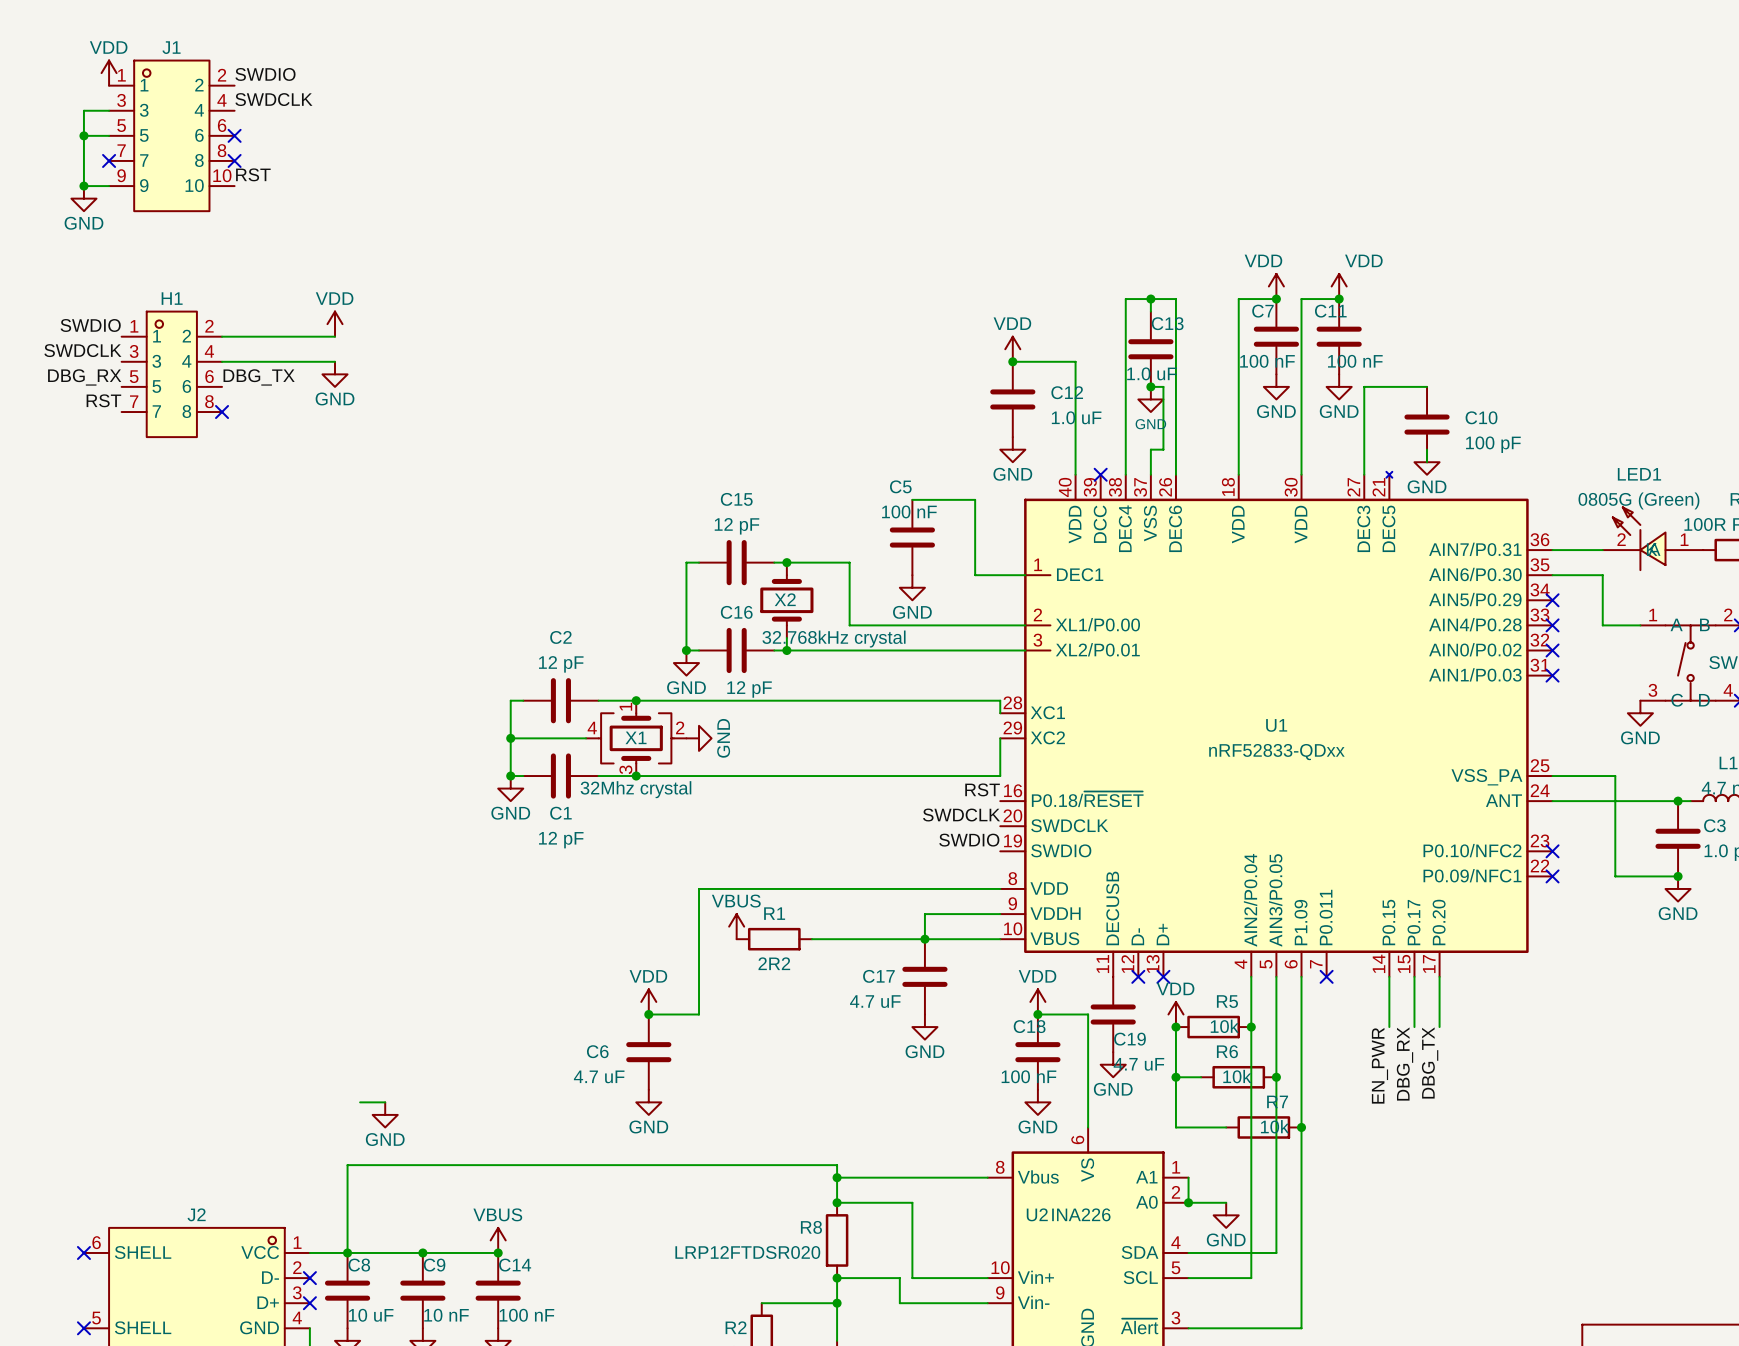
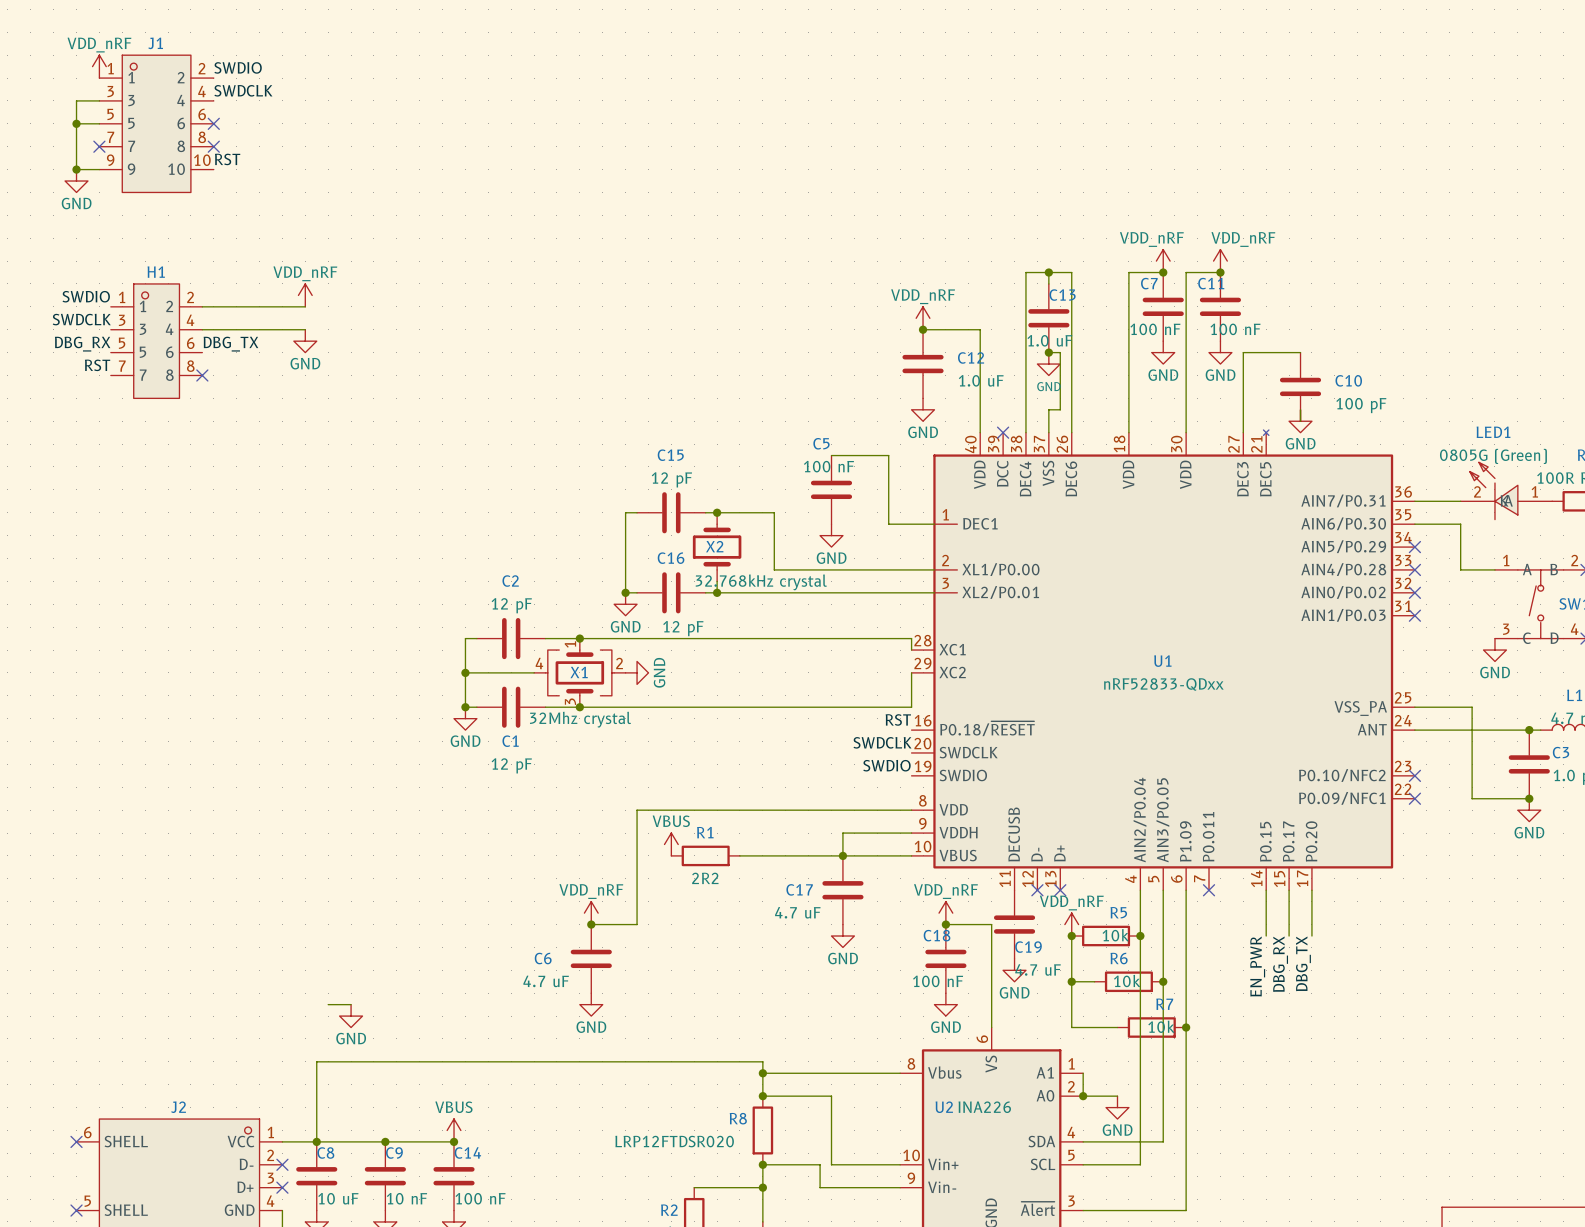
power symbol: VDD (109, 73) -> VDD_nRF (99, 66)
power symbol: VDD (1276, 286) -> VDD_nRF (1163, 261)
power symbol: VDD (1339, 286) -> VDD_nRF (1220, 261)
power symbol: VDD (335, 324) -> VDD_nRF (305, 295)
power symbol: VDD (1012, 349) -> VDD_nRF (923, 318)
power symbol: VDD (648, 1001) -> VDD_nRF (591, 913)
power symbol: VDD (1037, 1001) -> VDD_nRF (945, 913)
power symbol: VDD (1175, 1014) -> VDD_nRF (1071, 924)

